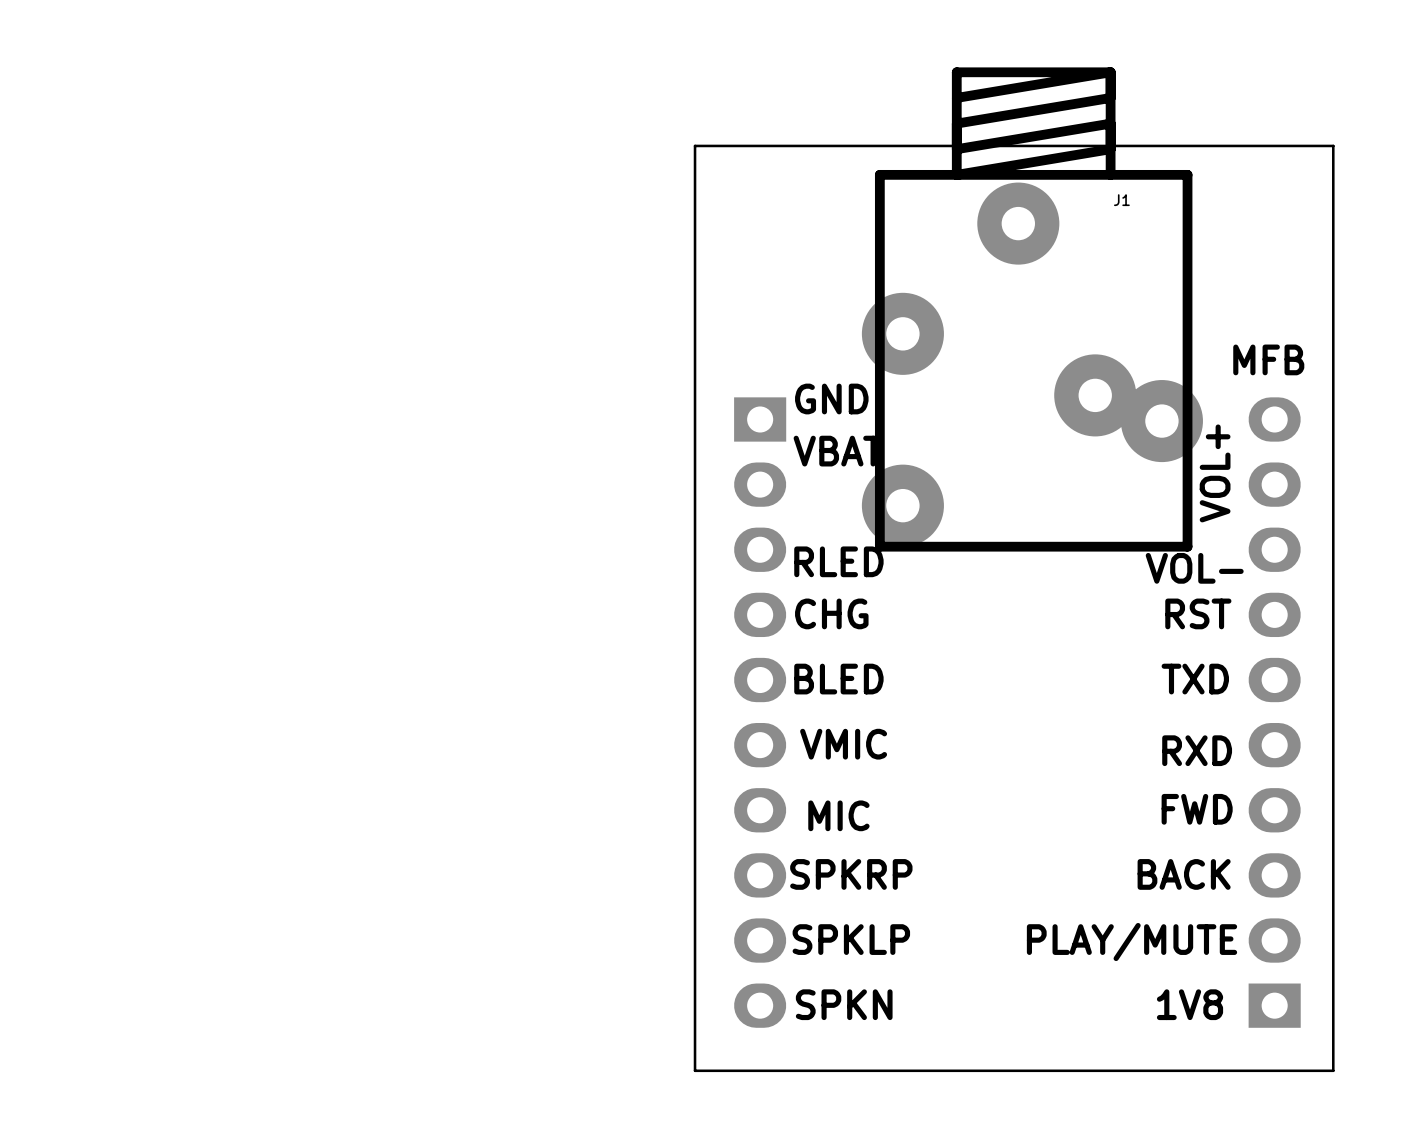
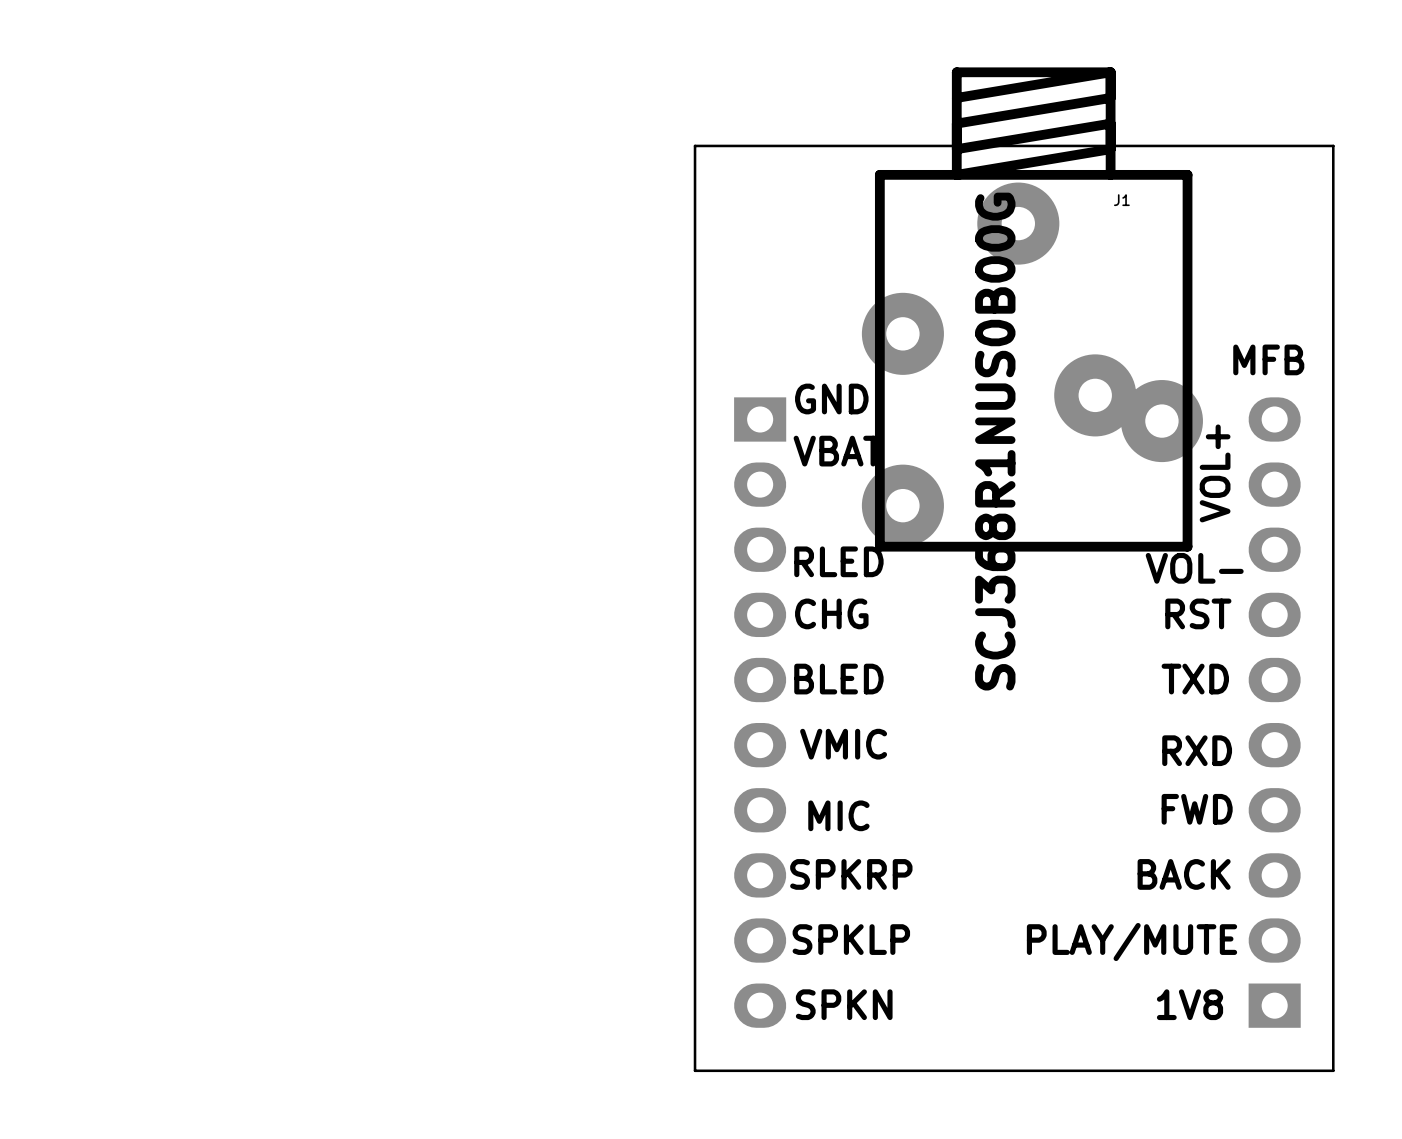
J1 value: none -> SCJ368R1NUS0B00G (995, 441)

